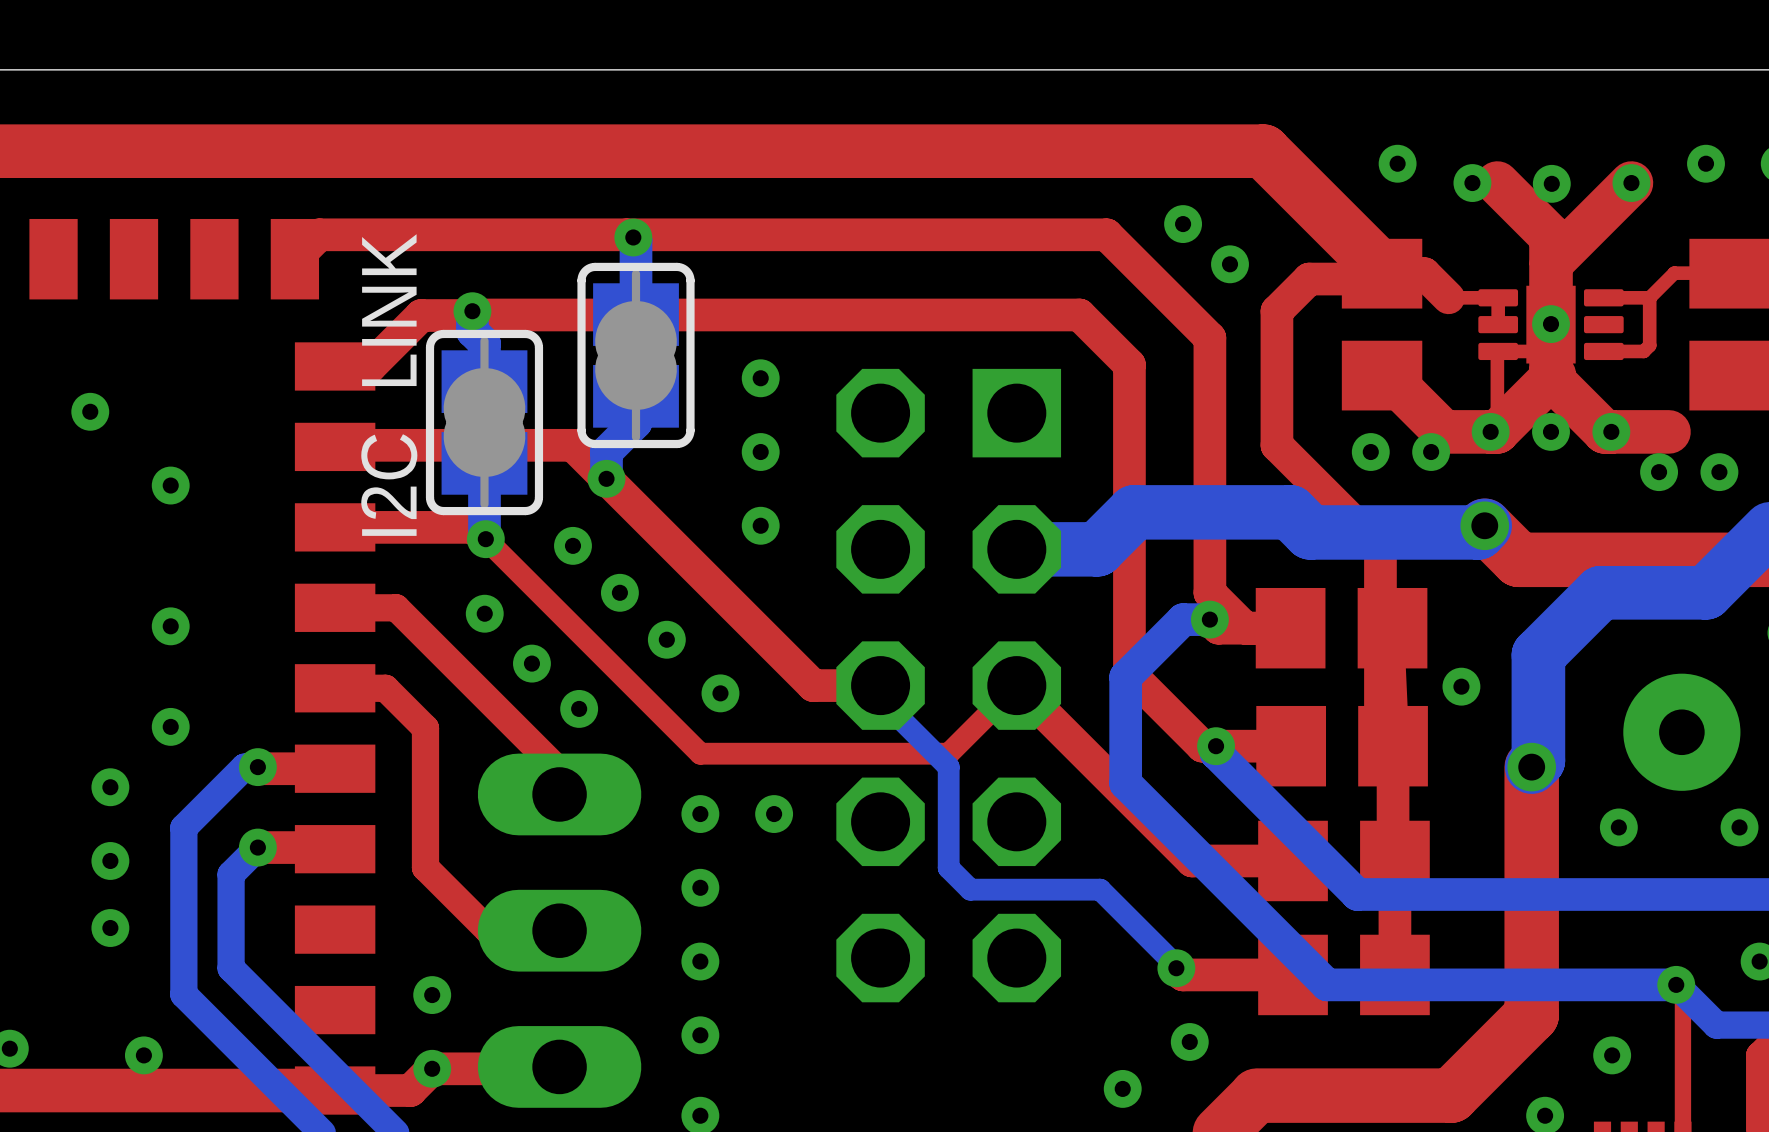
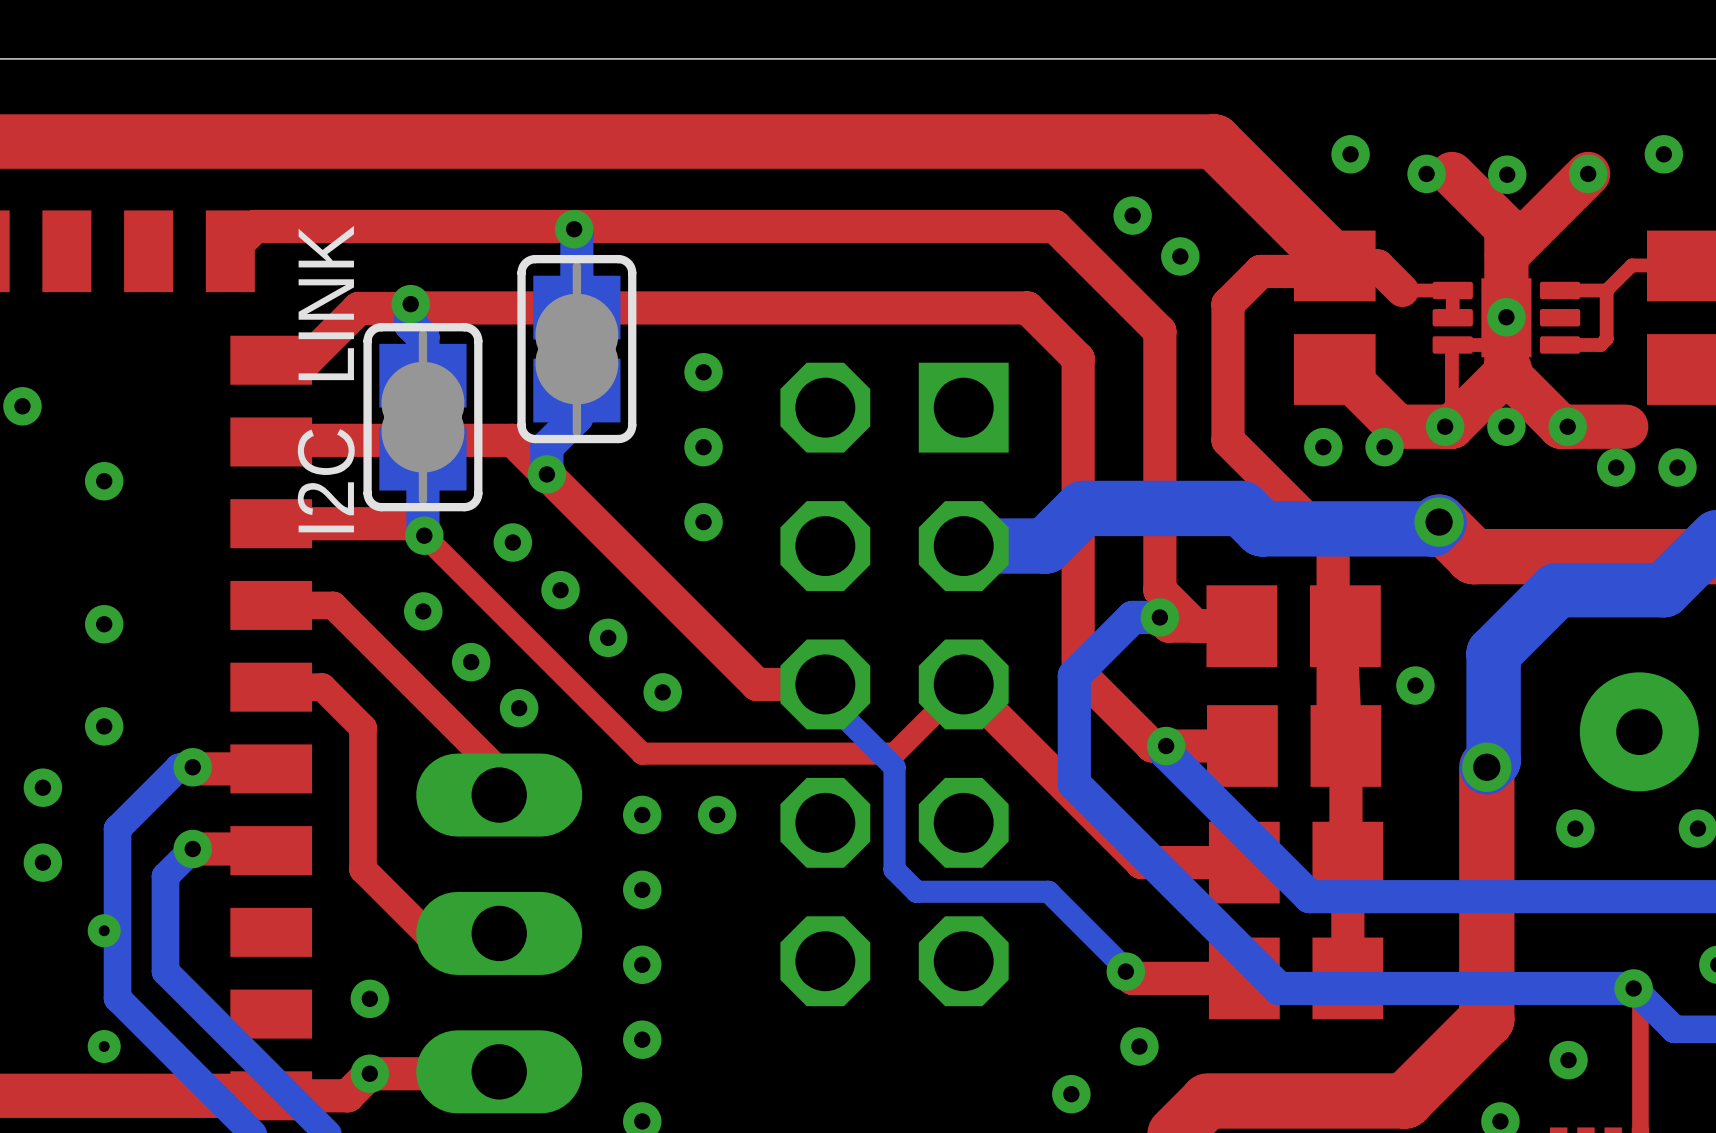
via: (110, 928) -> none
via: none -> (104, 930)
via position: (143, 1055) -> (104, 1046)

